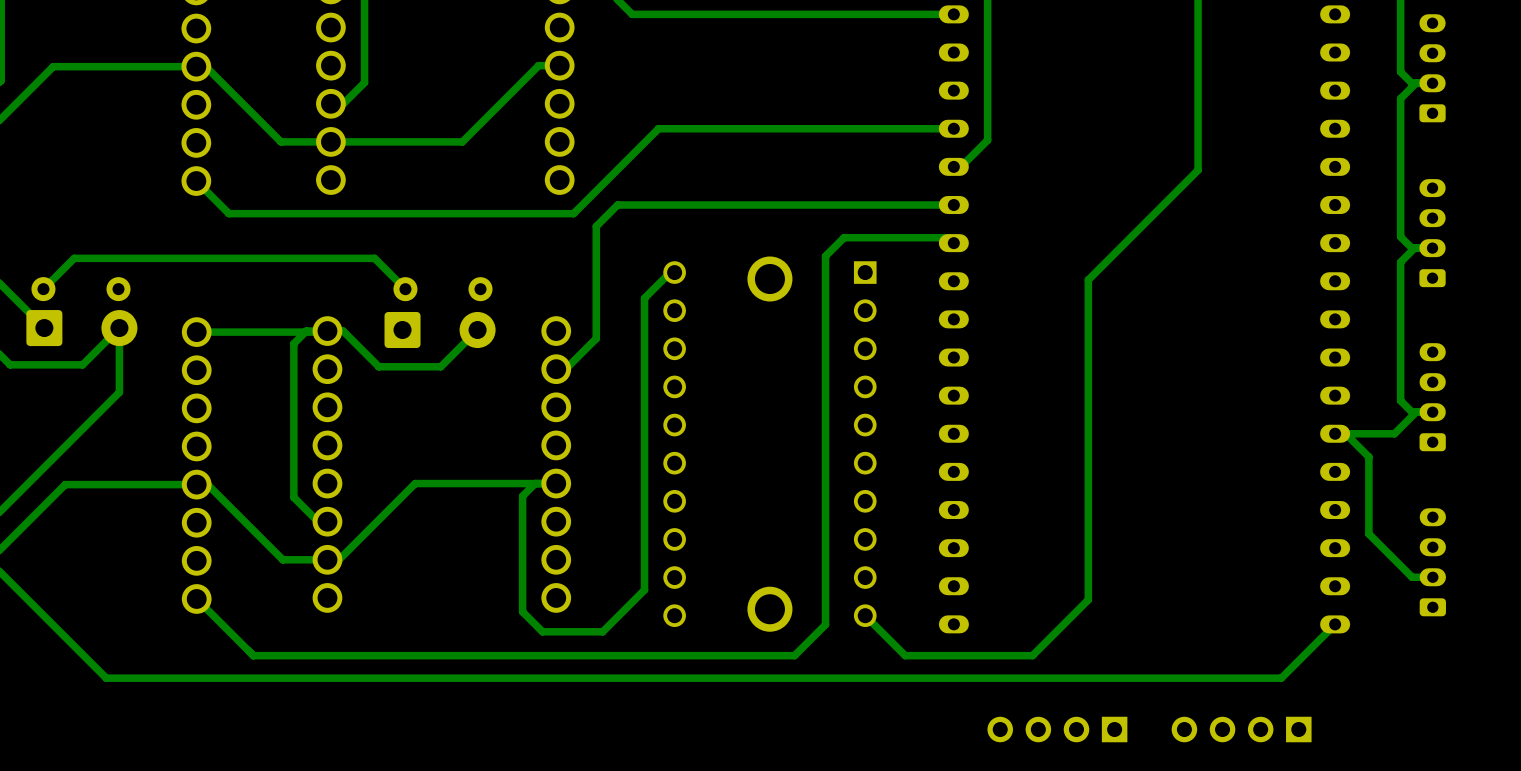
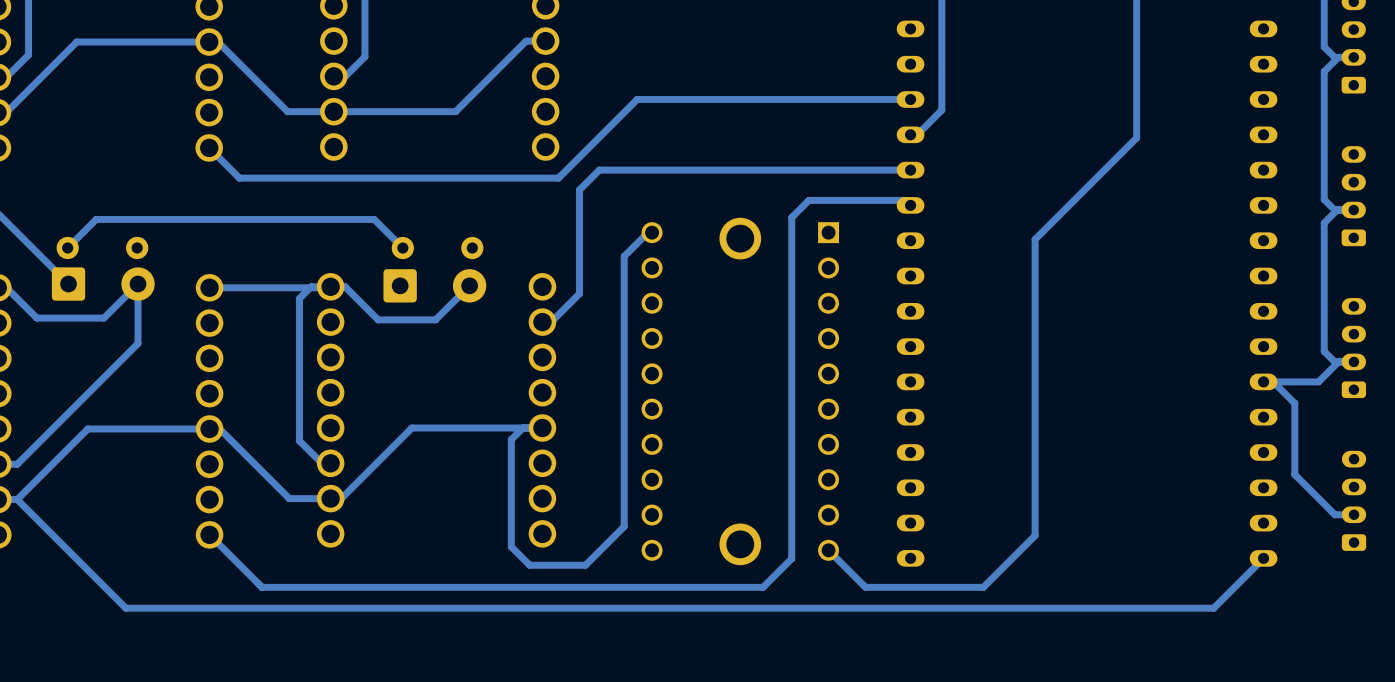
part: (1057, 729) -> none
part: (1241, 729) -> none

